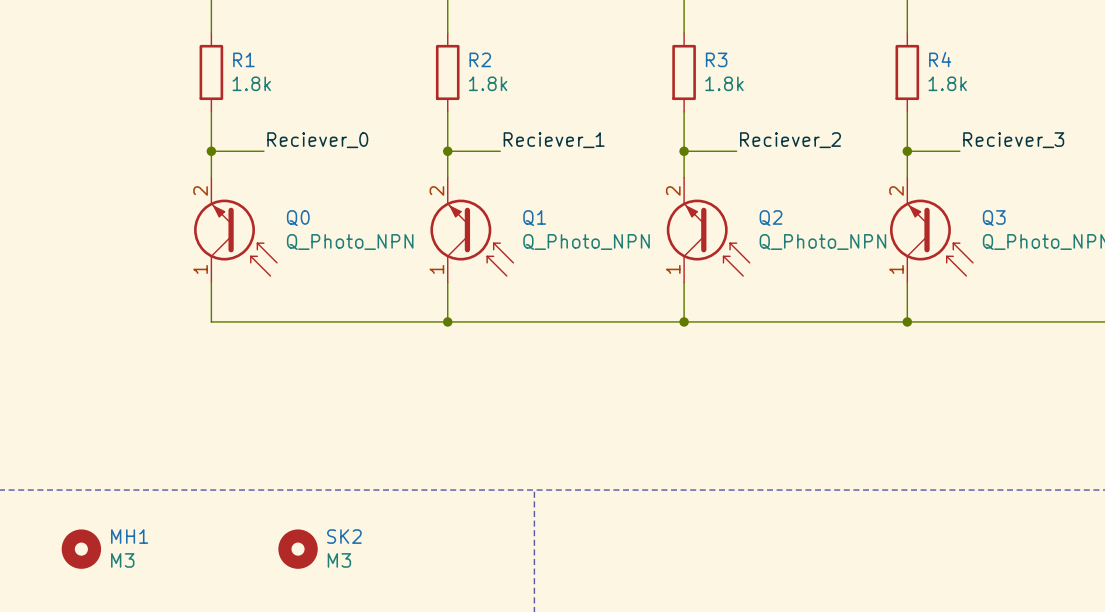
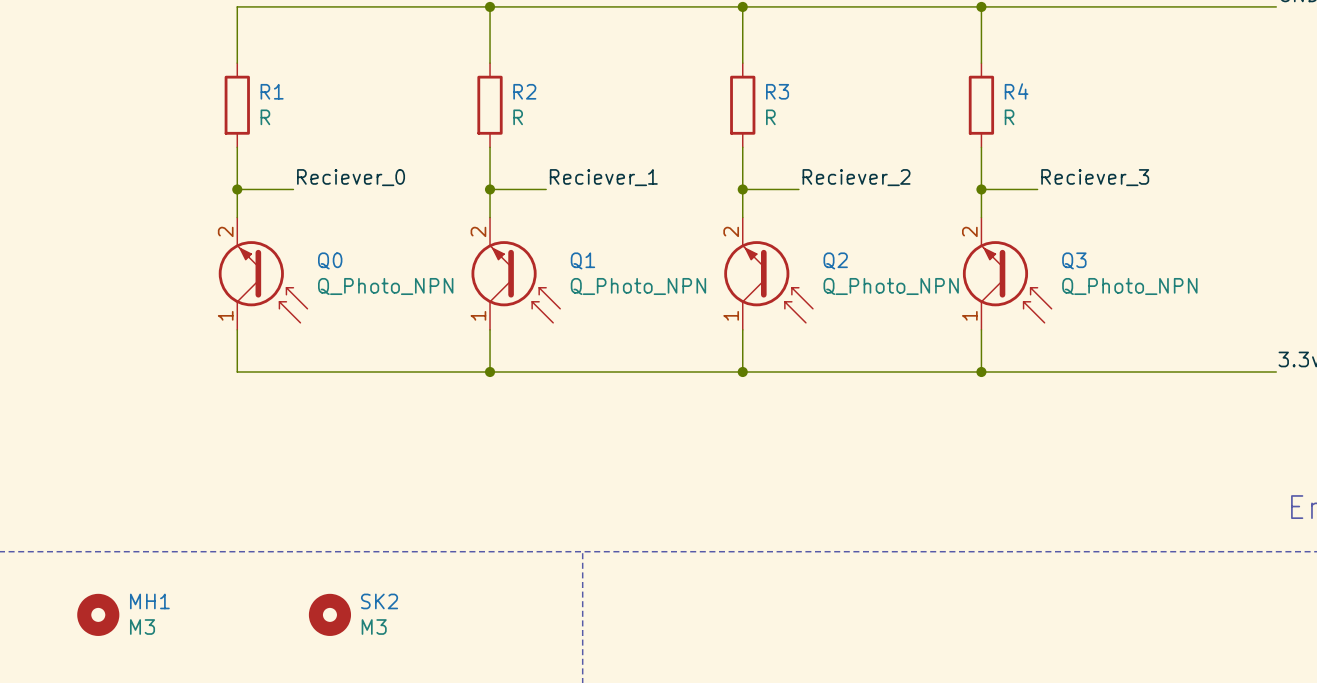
R1 value: 1.8k (251, 83) -> R (265, 117)
R2 value: 1.8k (488, 83) -> R (518, 117)
R3 value: 1.8k (724, 83) -> R (770, 117)
R4 value: 1.8k (947, 83) -> R (1009, 117)

